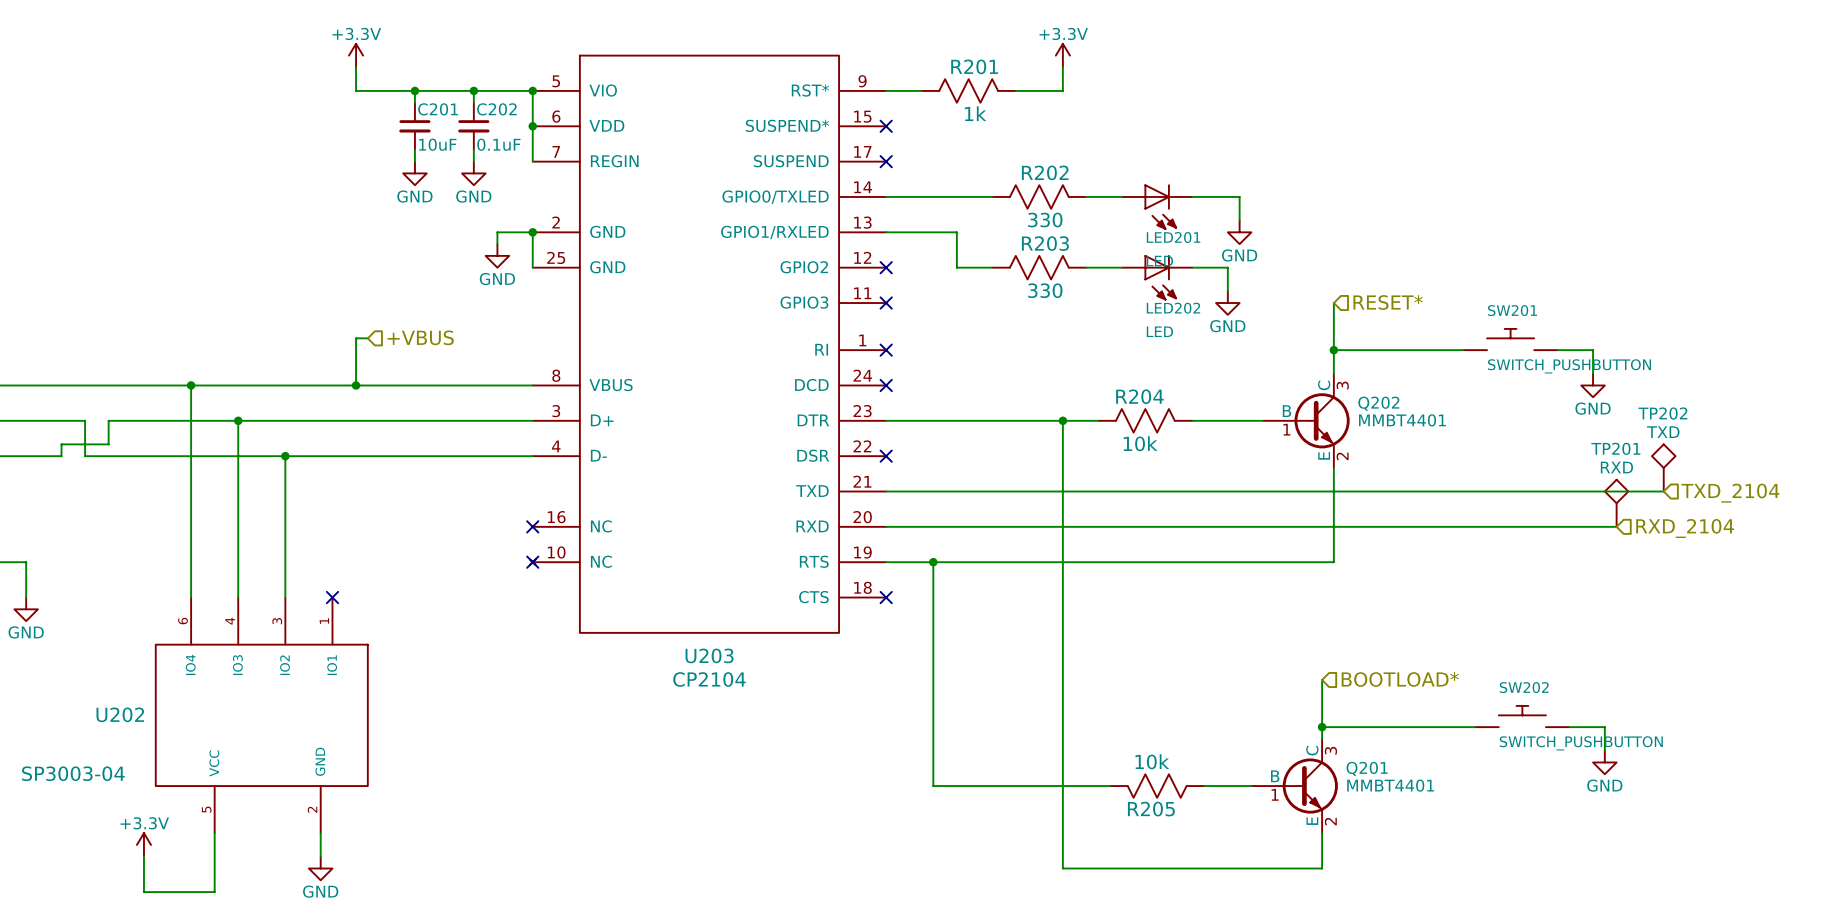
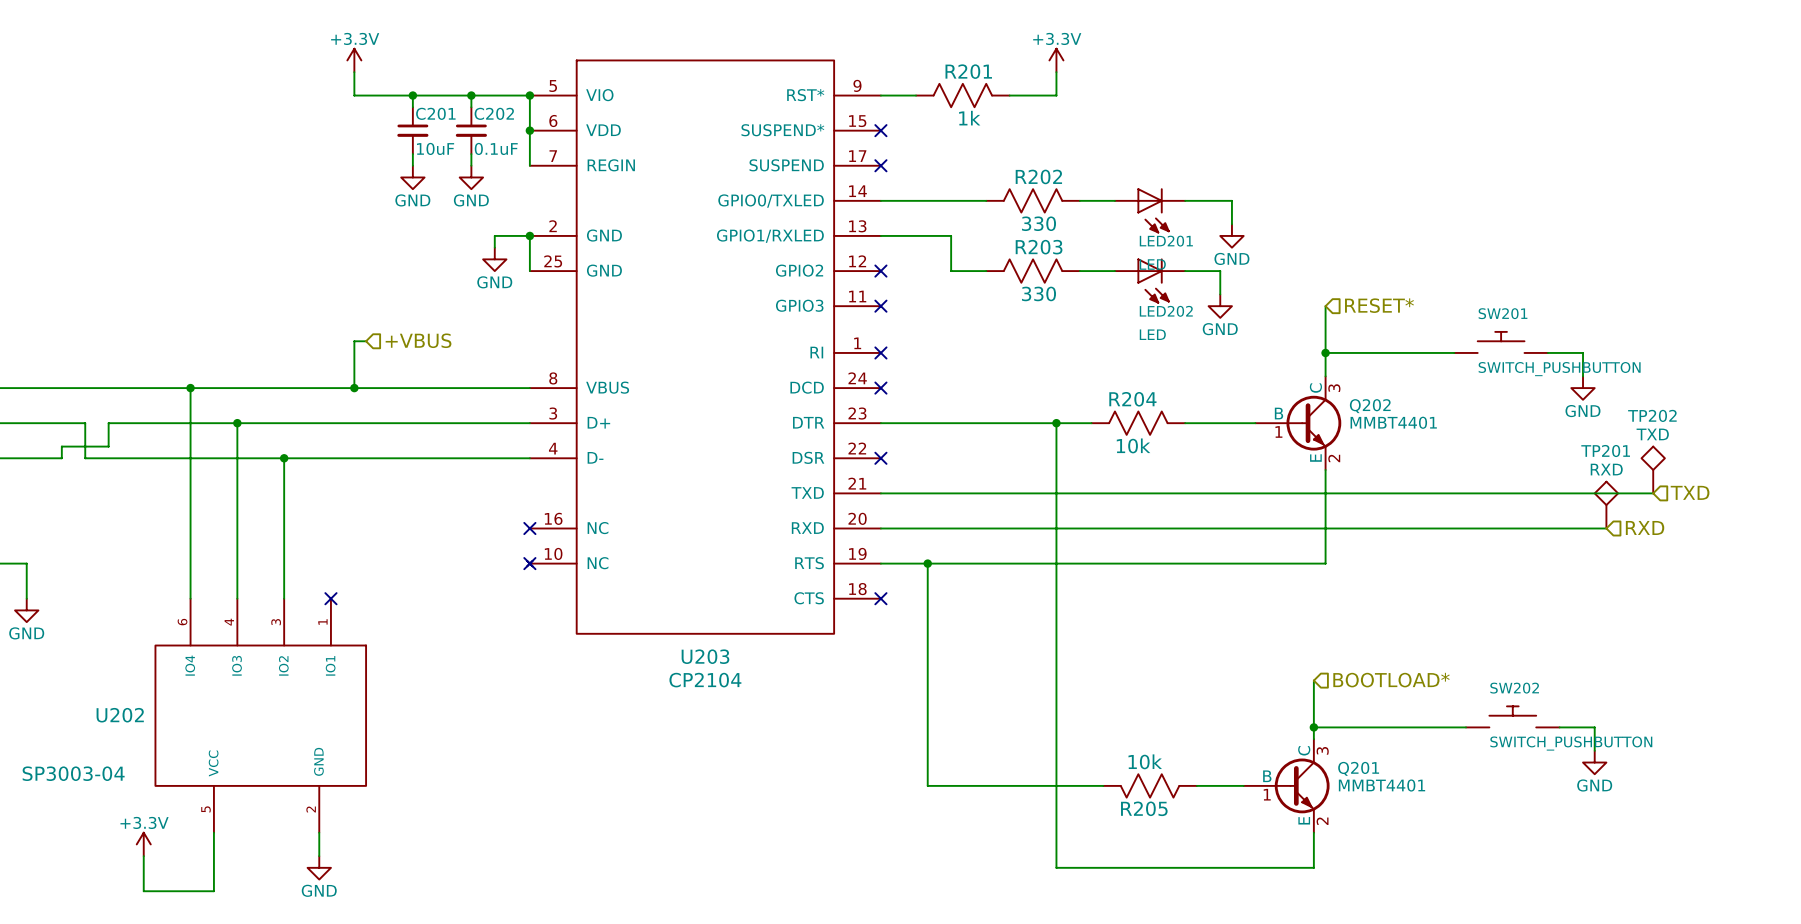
hierarchical label: TXD_2104 (1730, 493) -> TXD (1690, 492)
hierarchical label: RXD_2104 (1685, 528) -> RXD (1645, 527)

